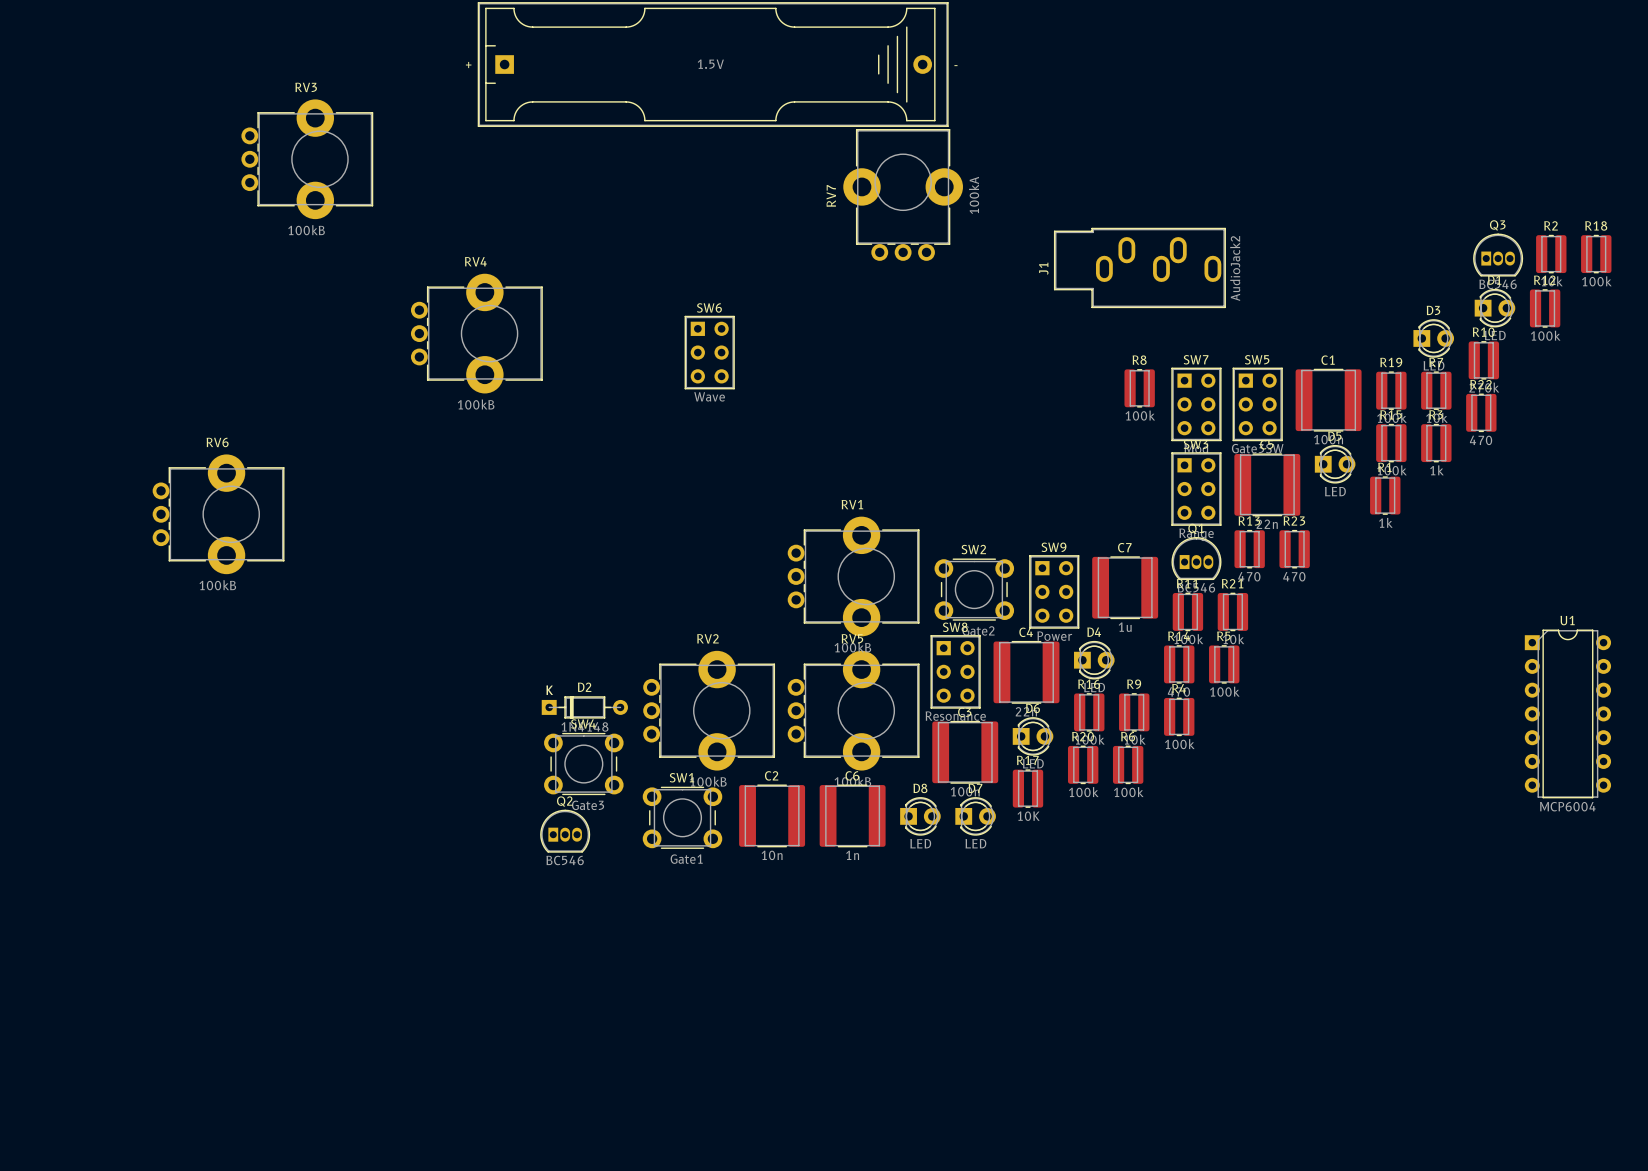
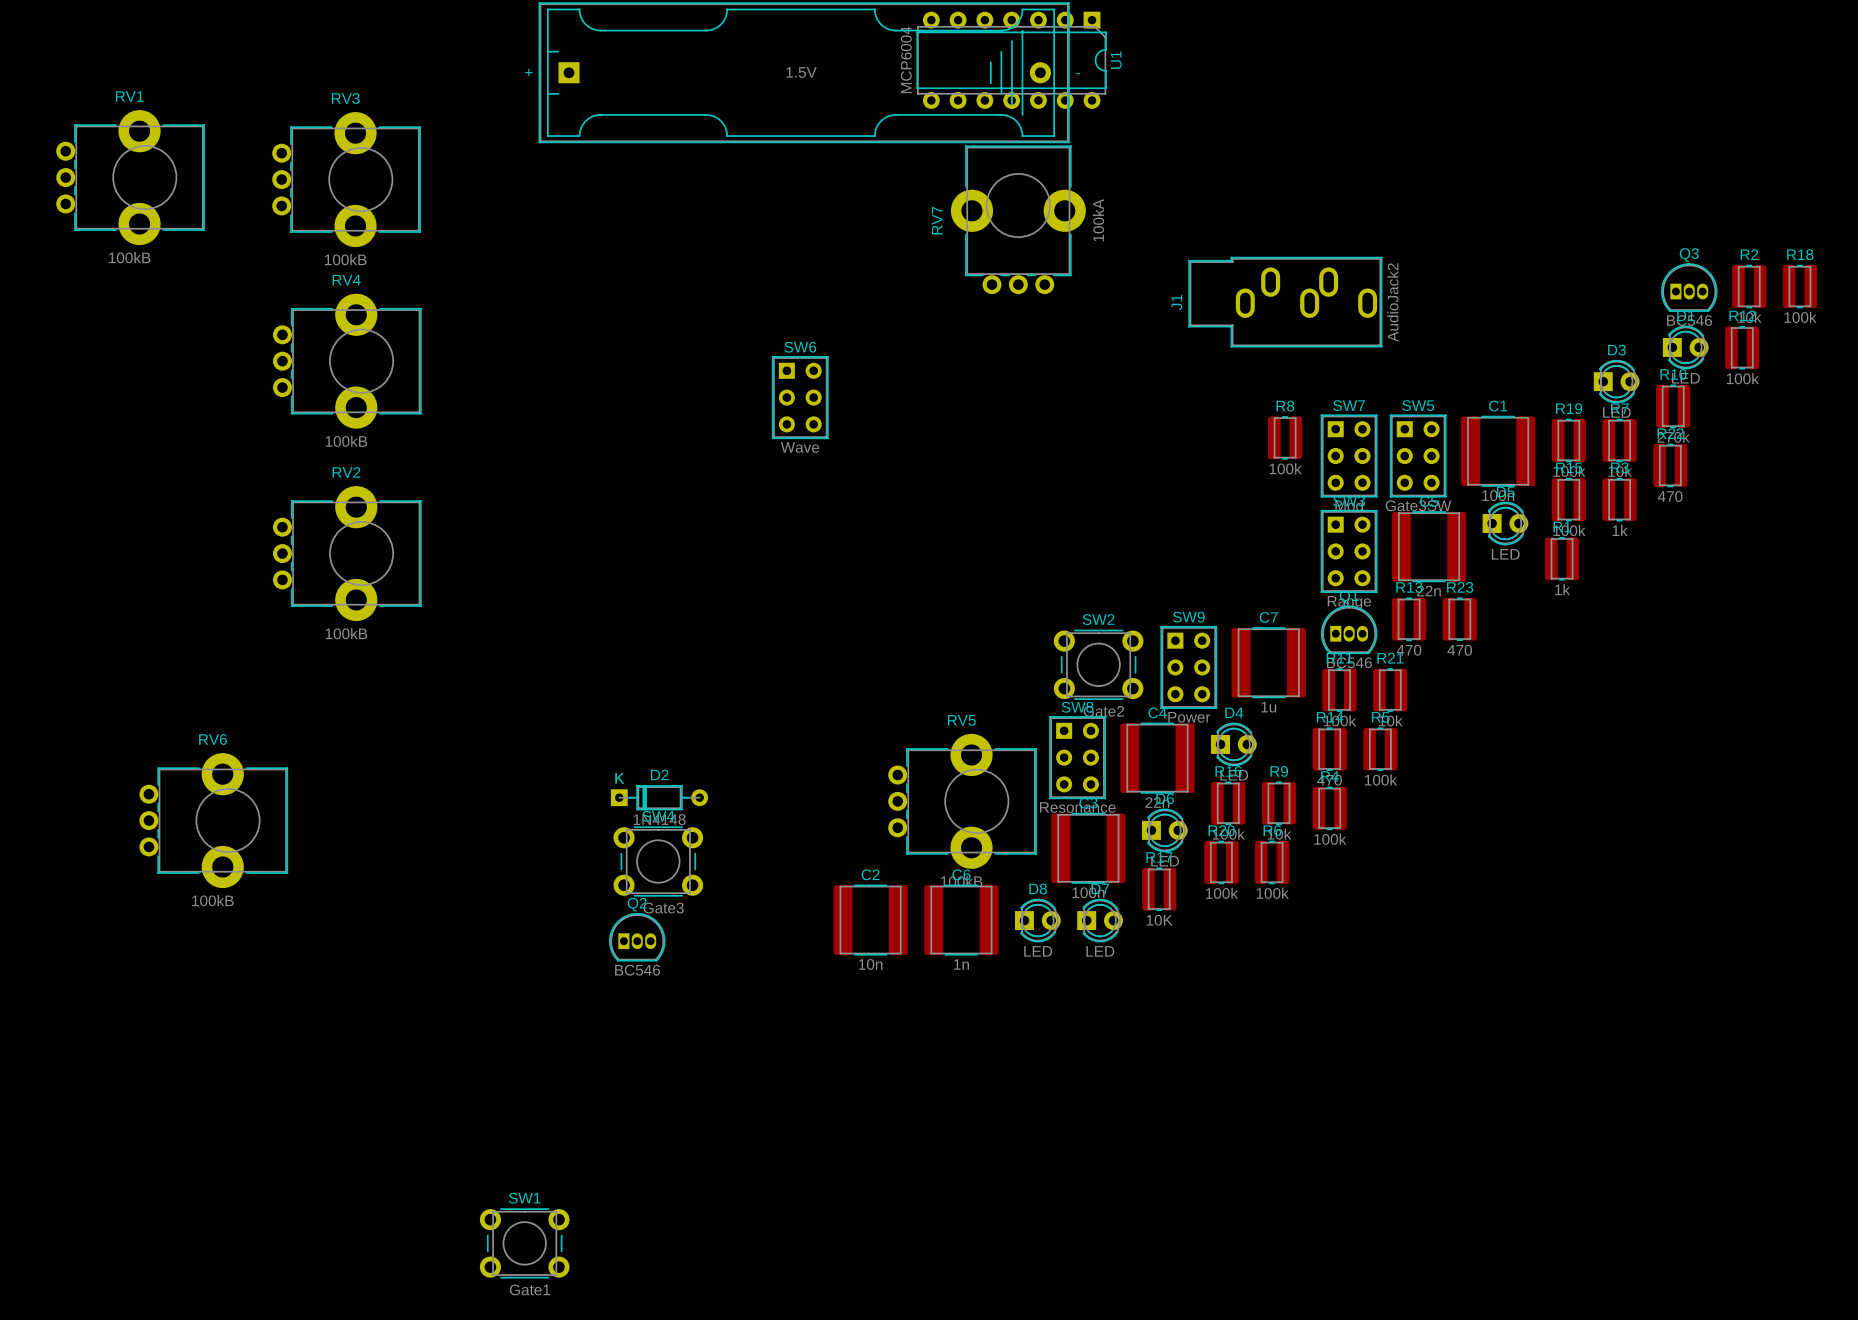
RV4 position: (476, 333) -> (347, 361)
RV6 position: (218, 514) -> (213, 820)
RV1 position: (853, 576) -> (130, 177)
RV2 position: (709, 710) -> (347, 553)
U1 rotation: 0° (1567, 713) -> 90° clockwise (1011, 60)
U1 position: (1567, 713) -> (1011, 60)
SW1 position: (682, 817) -> (524, 1243)

